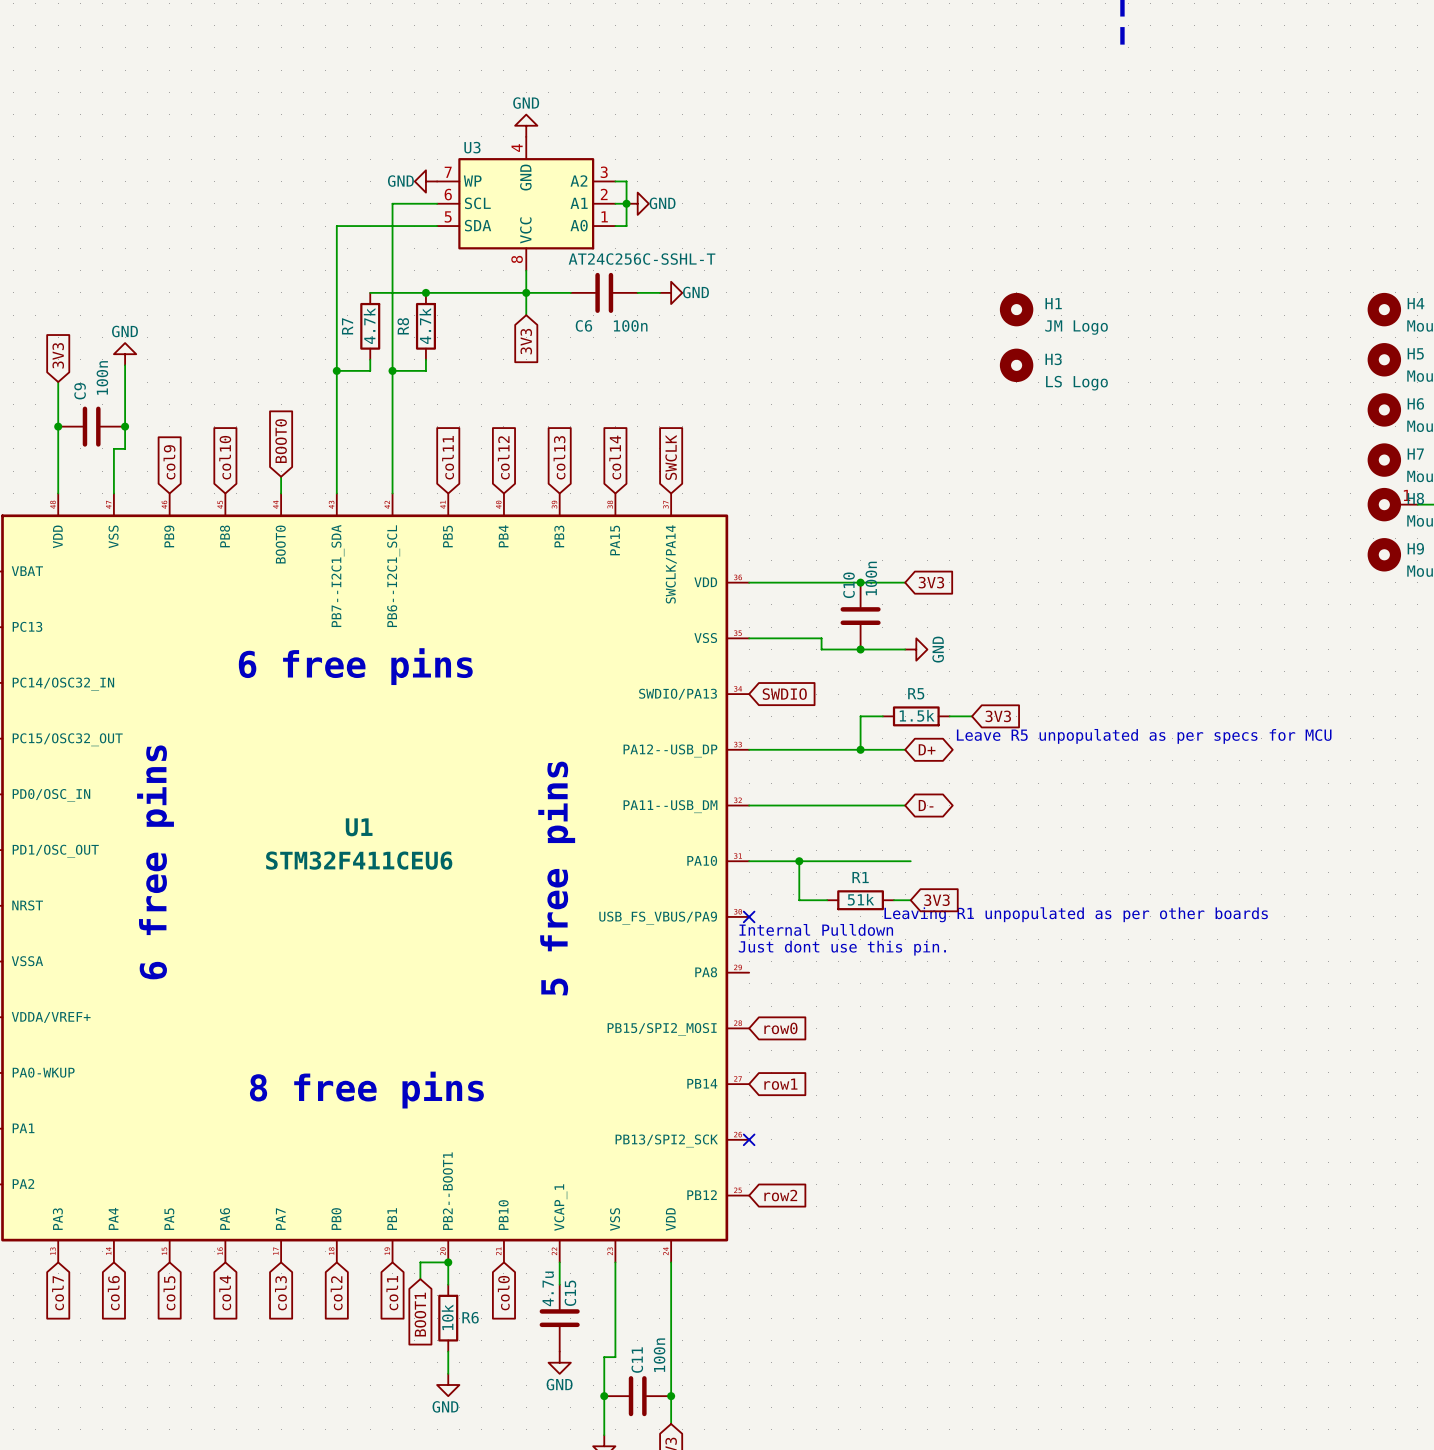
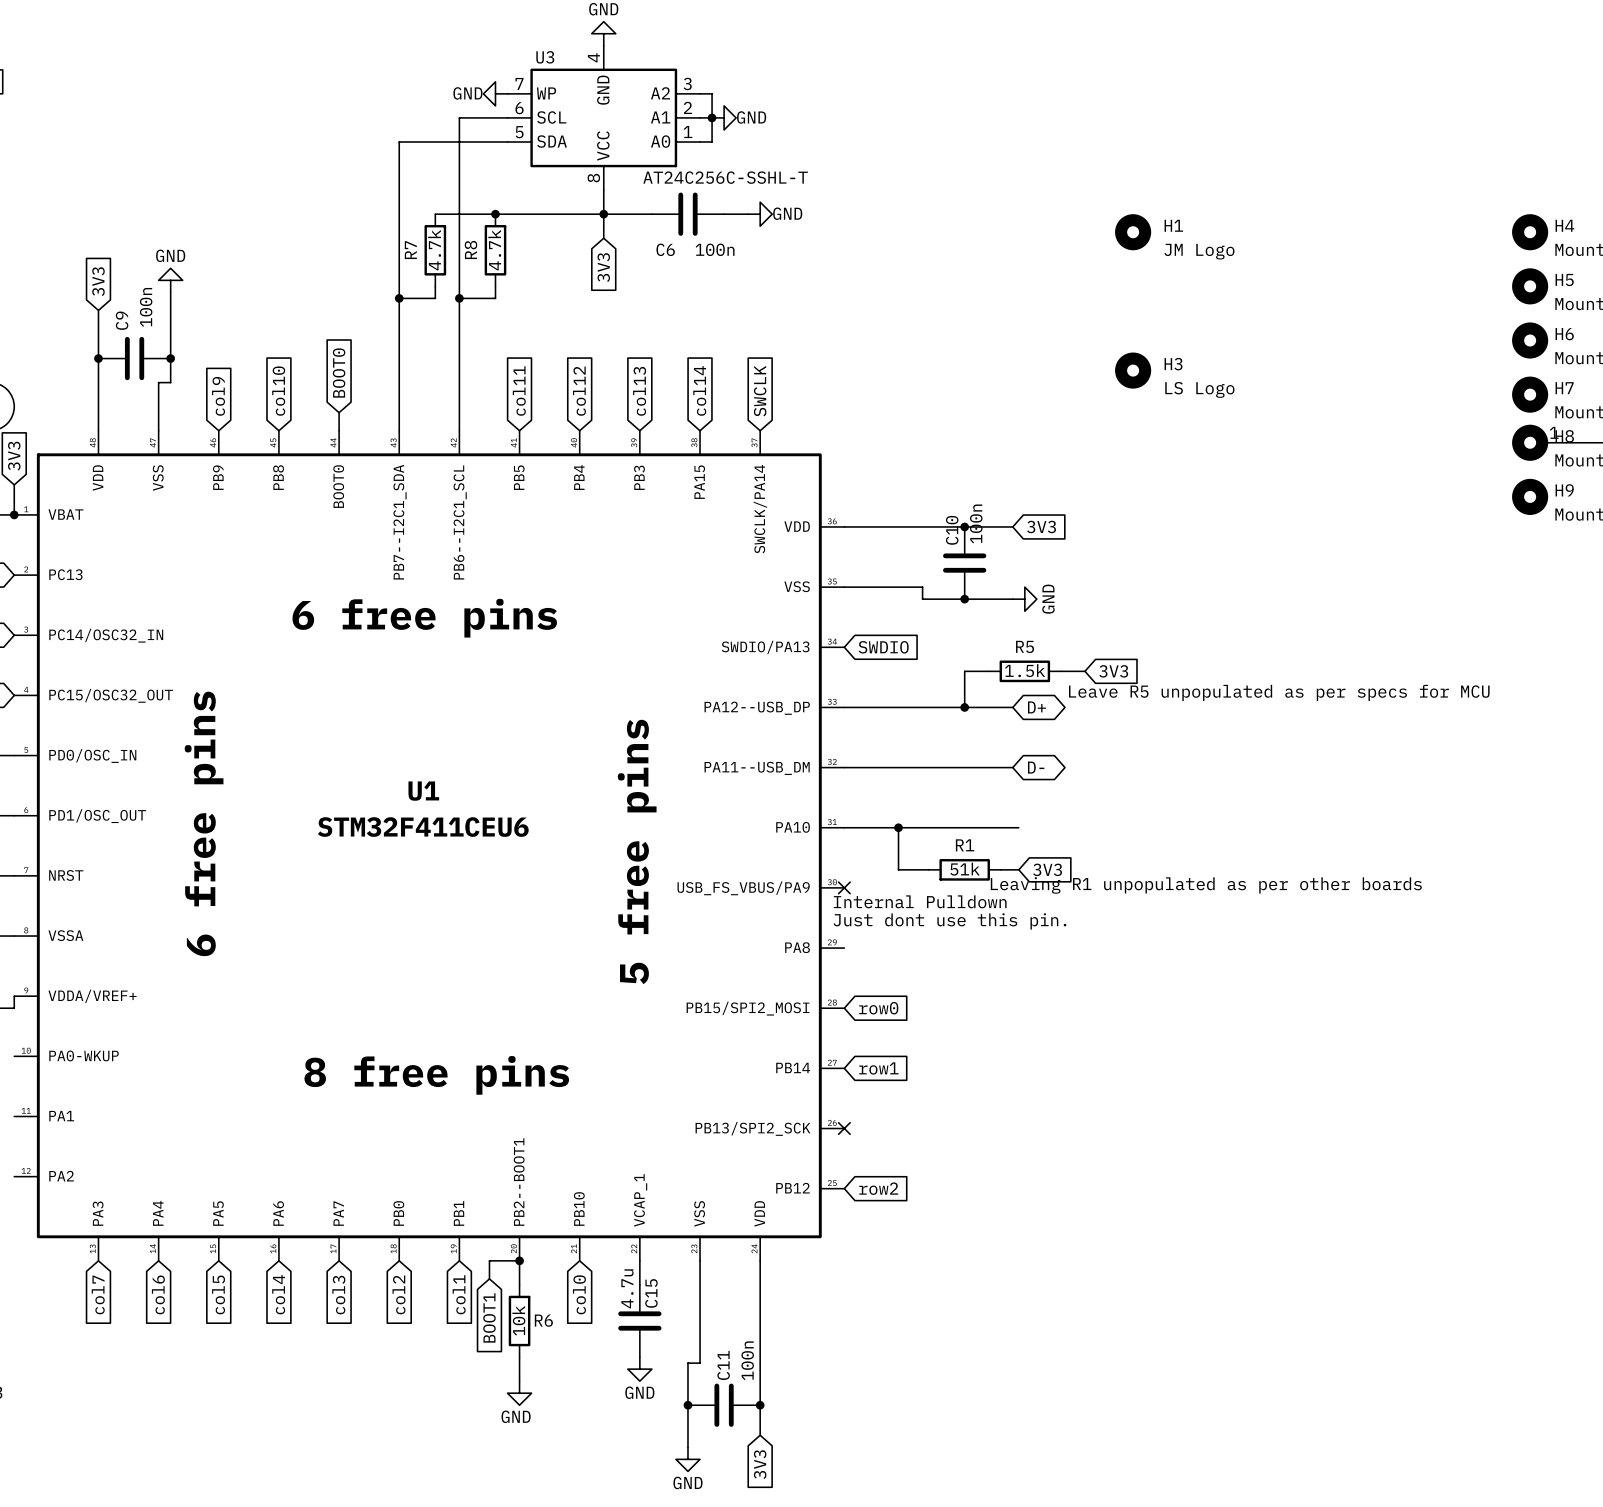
H3 position: (1016, 365) -> (1133, 370)

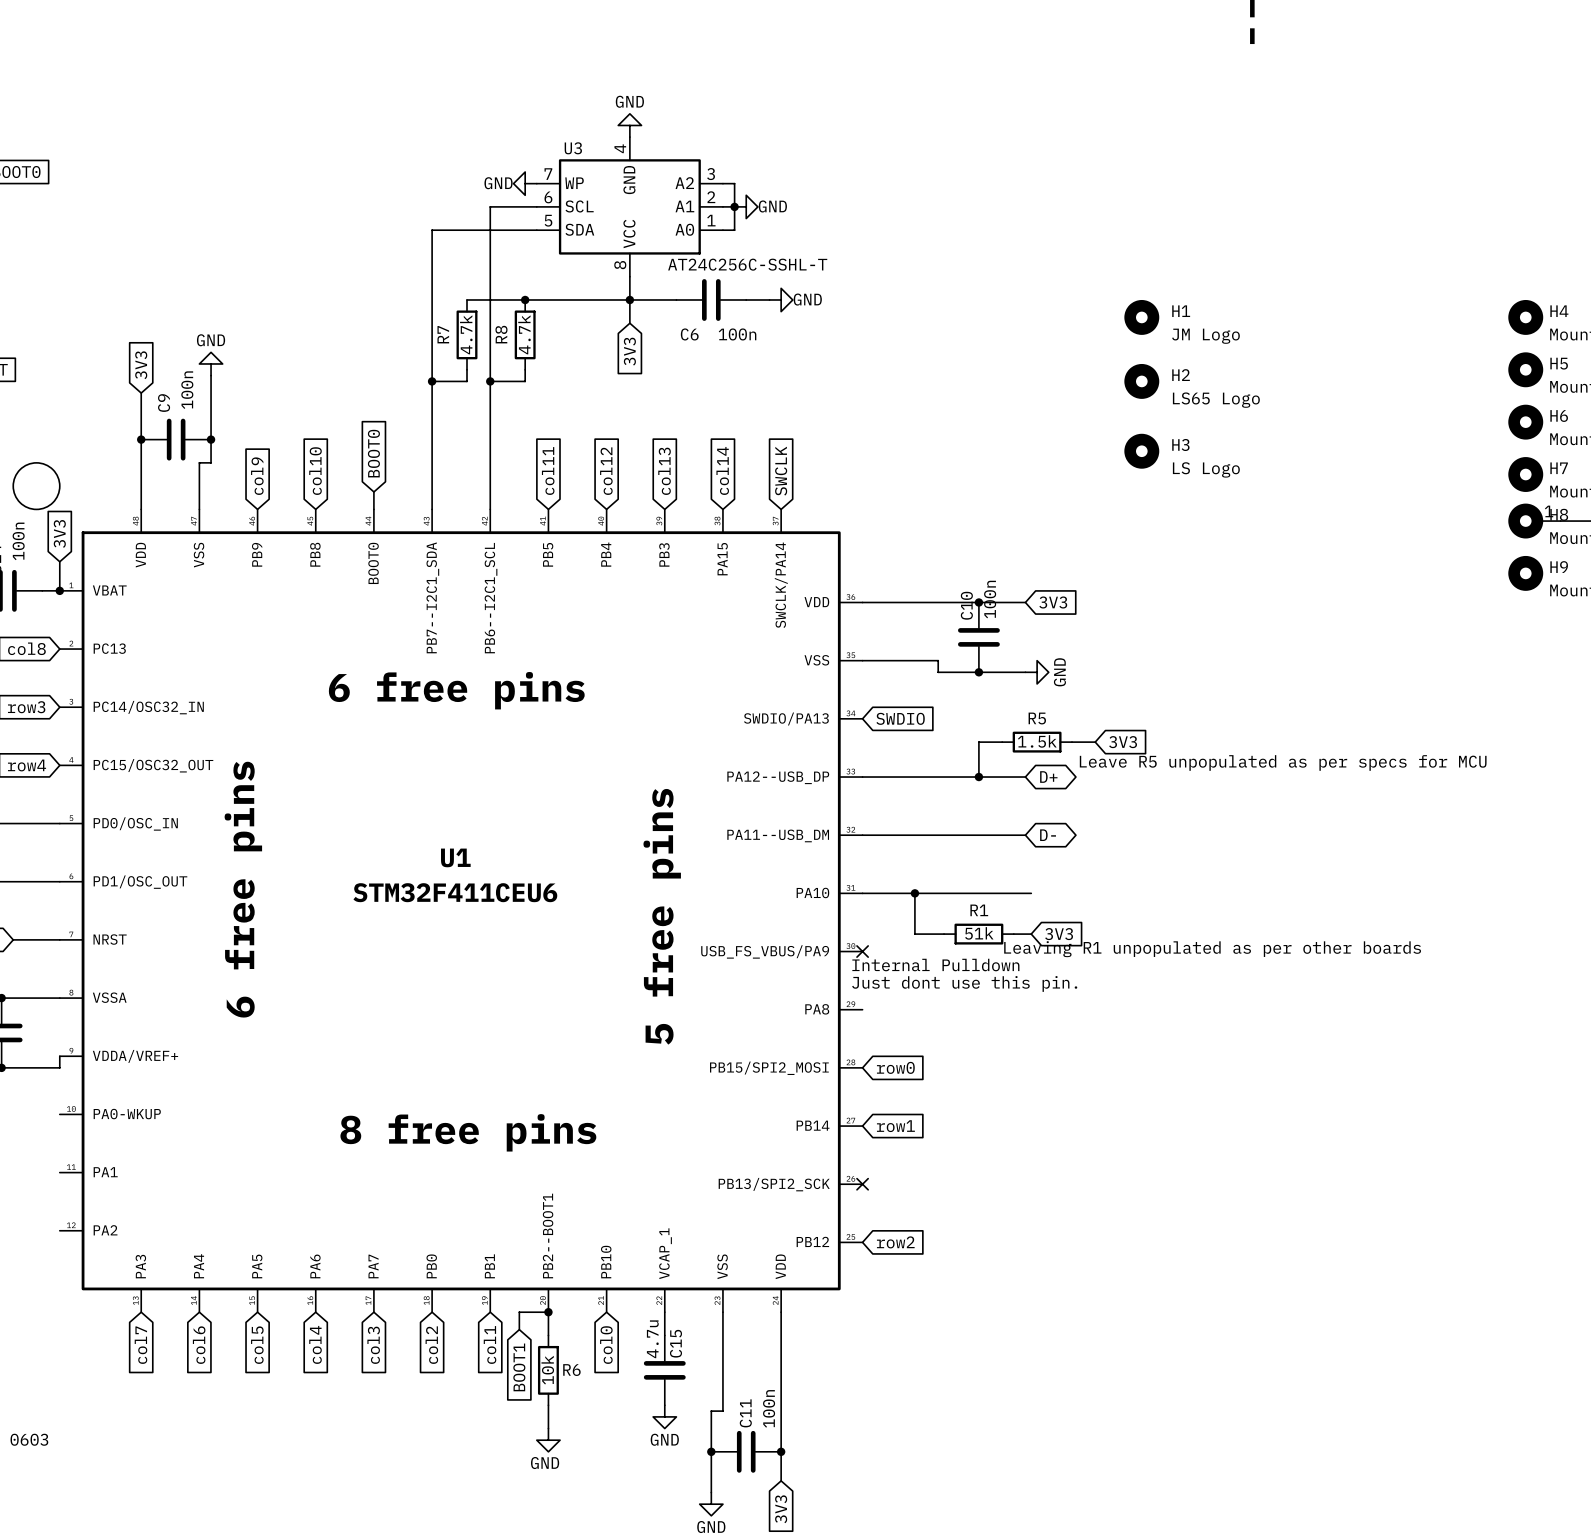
H2: none -> LS65 Logo (1141, 381)

